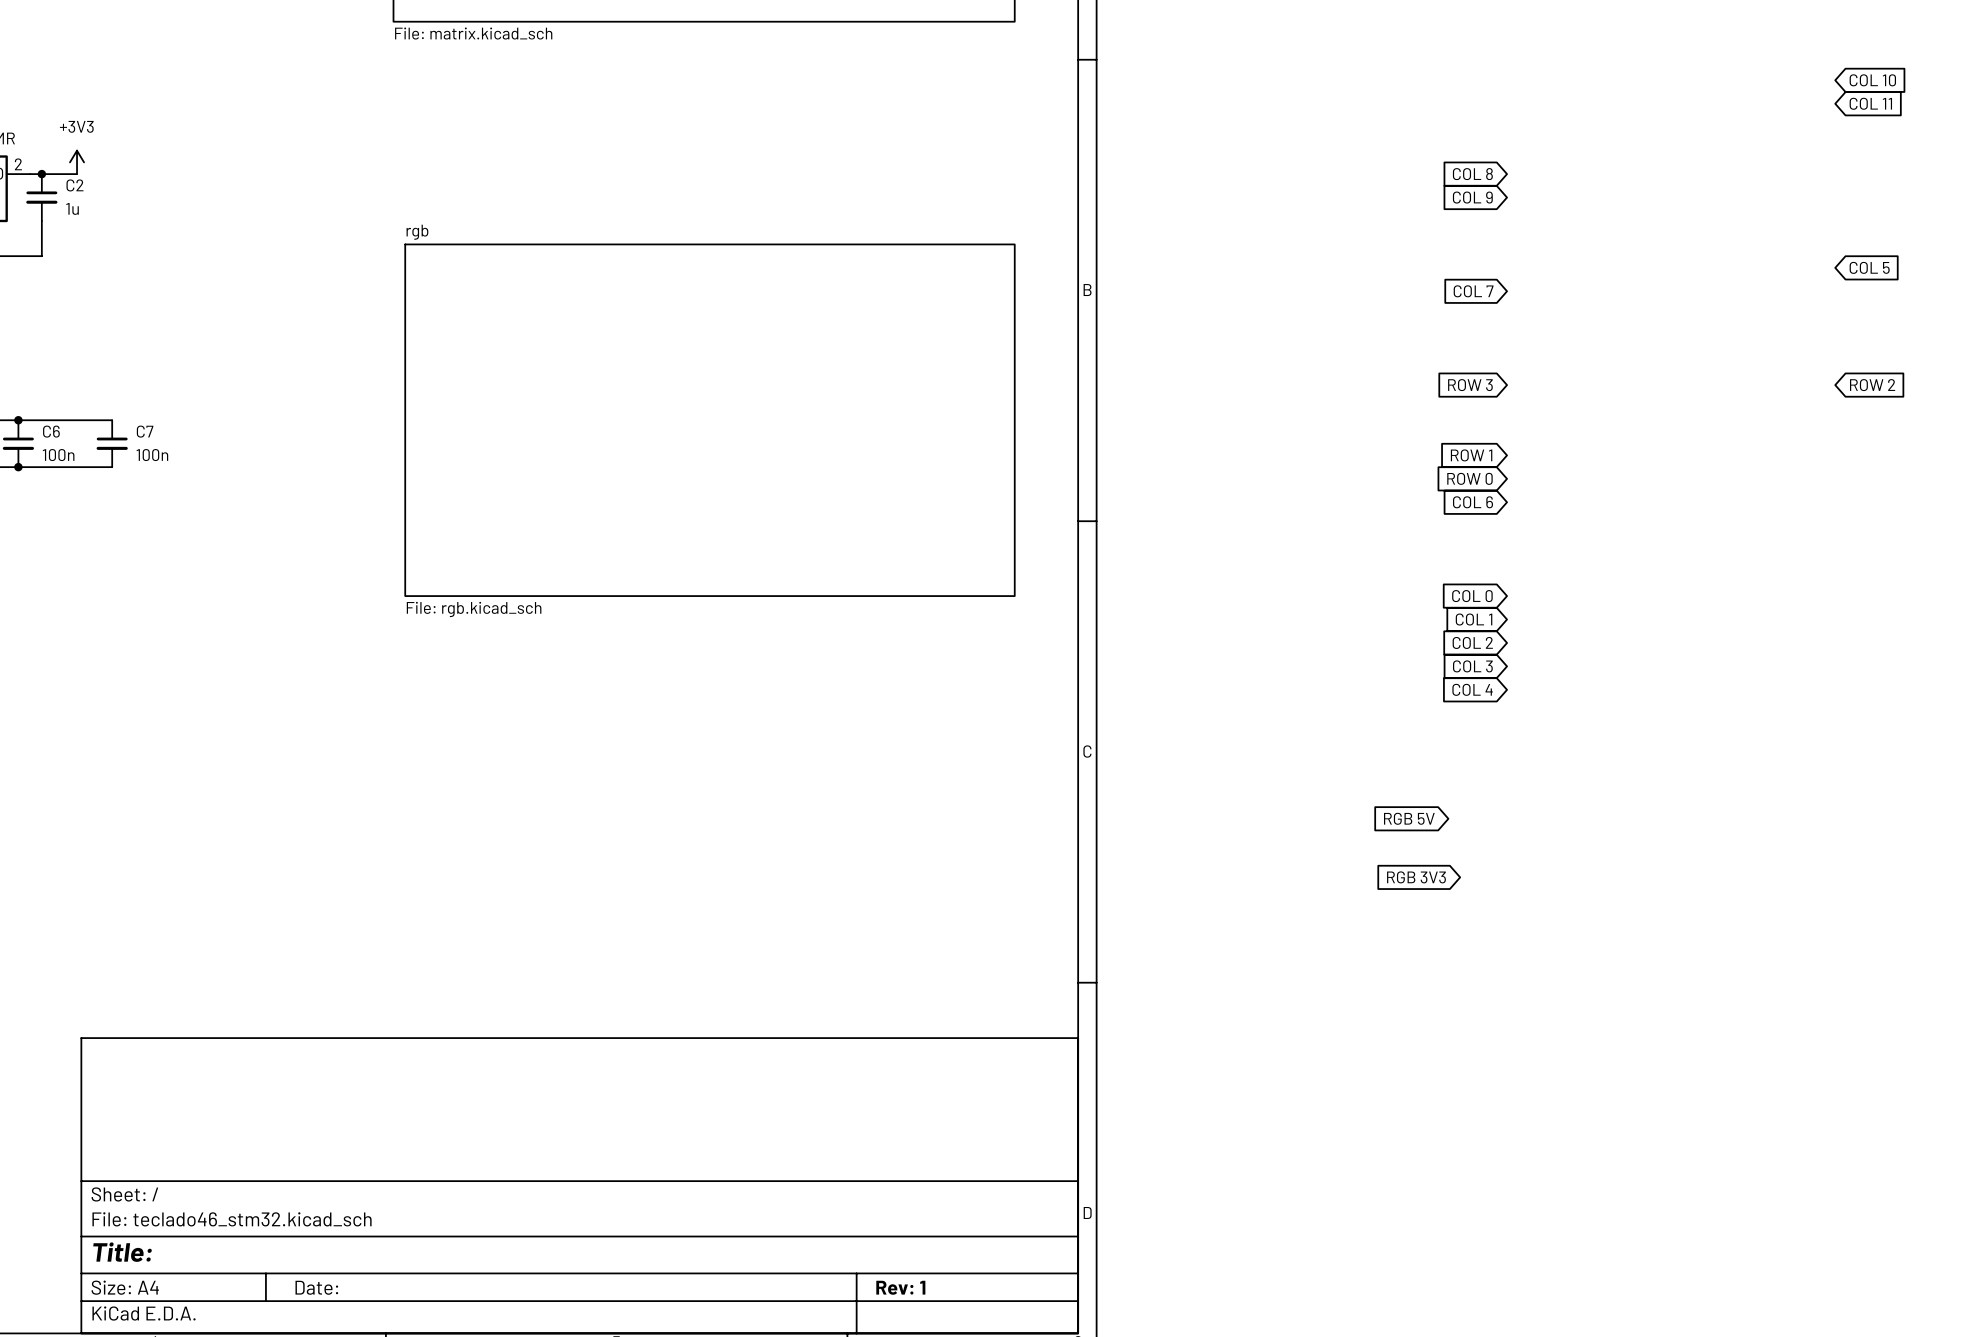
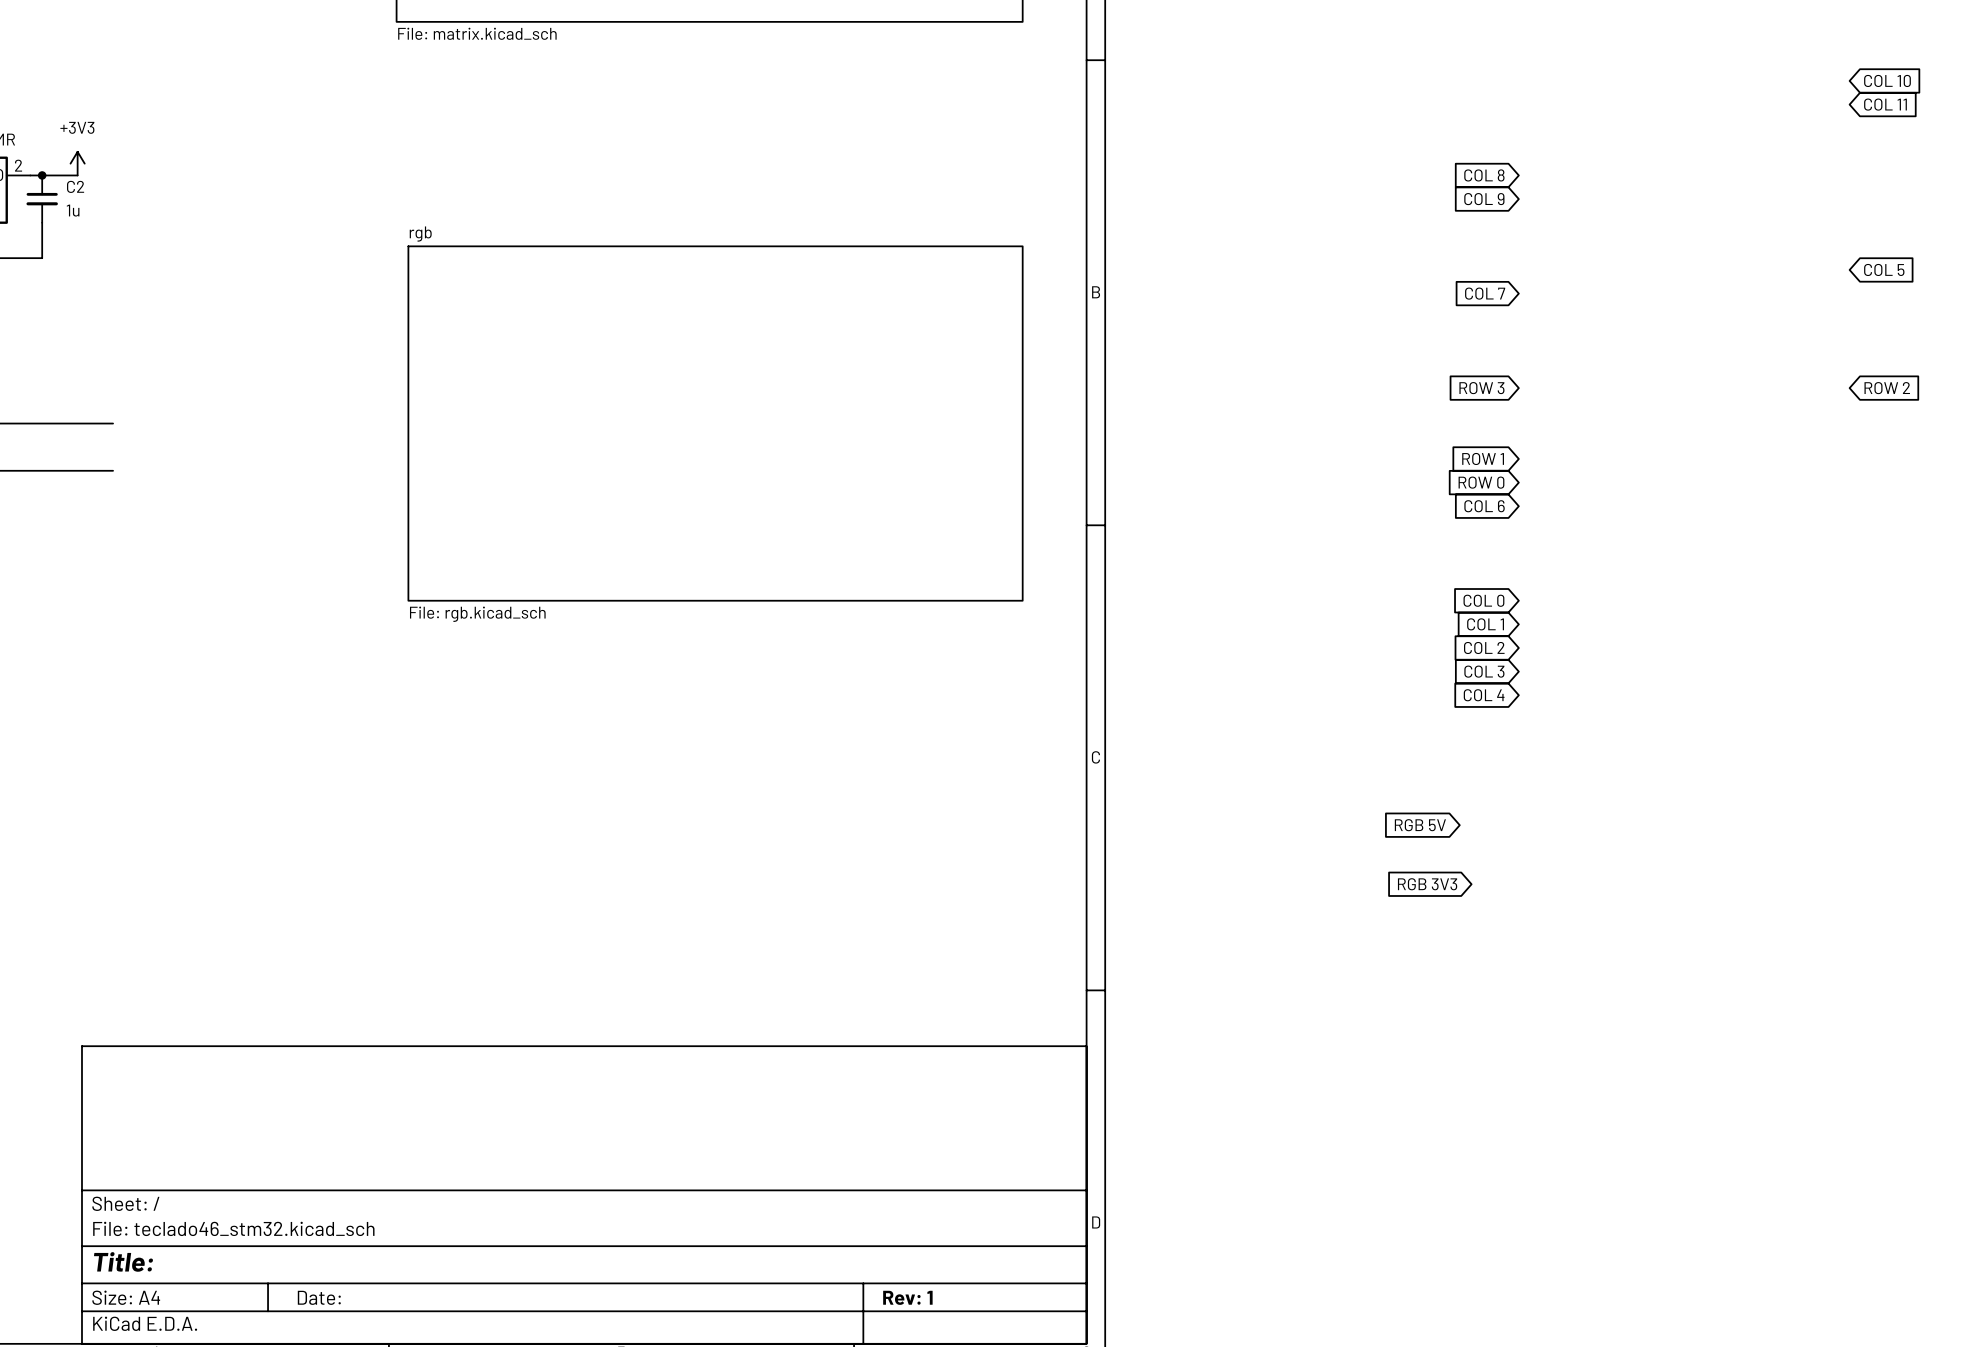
junction: (18, 420) -> none
C6: 100n (18, 443) -> none
C7: 100n (112, 443) -> none
junction: (18, 467) -> none

